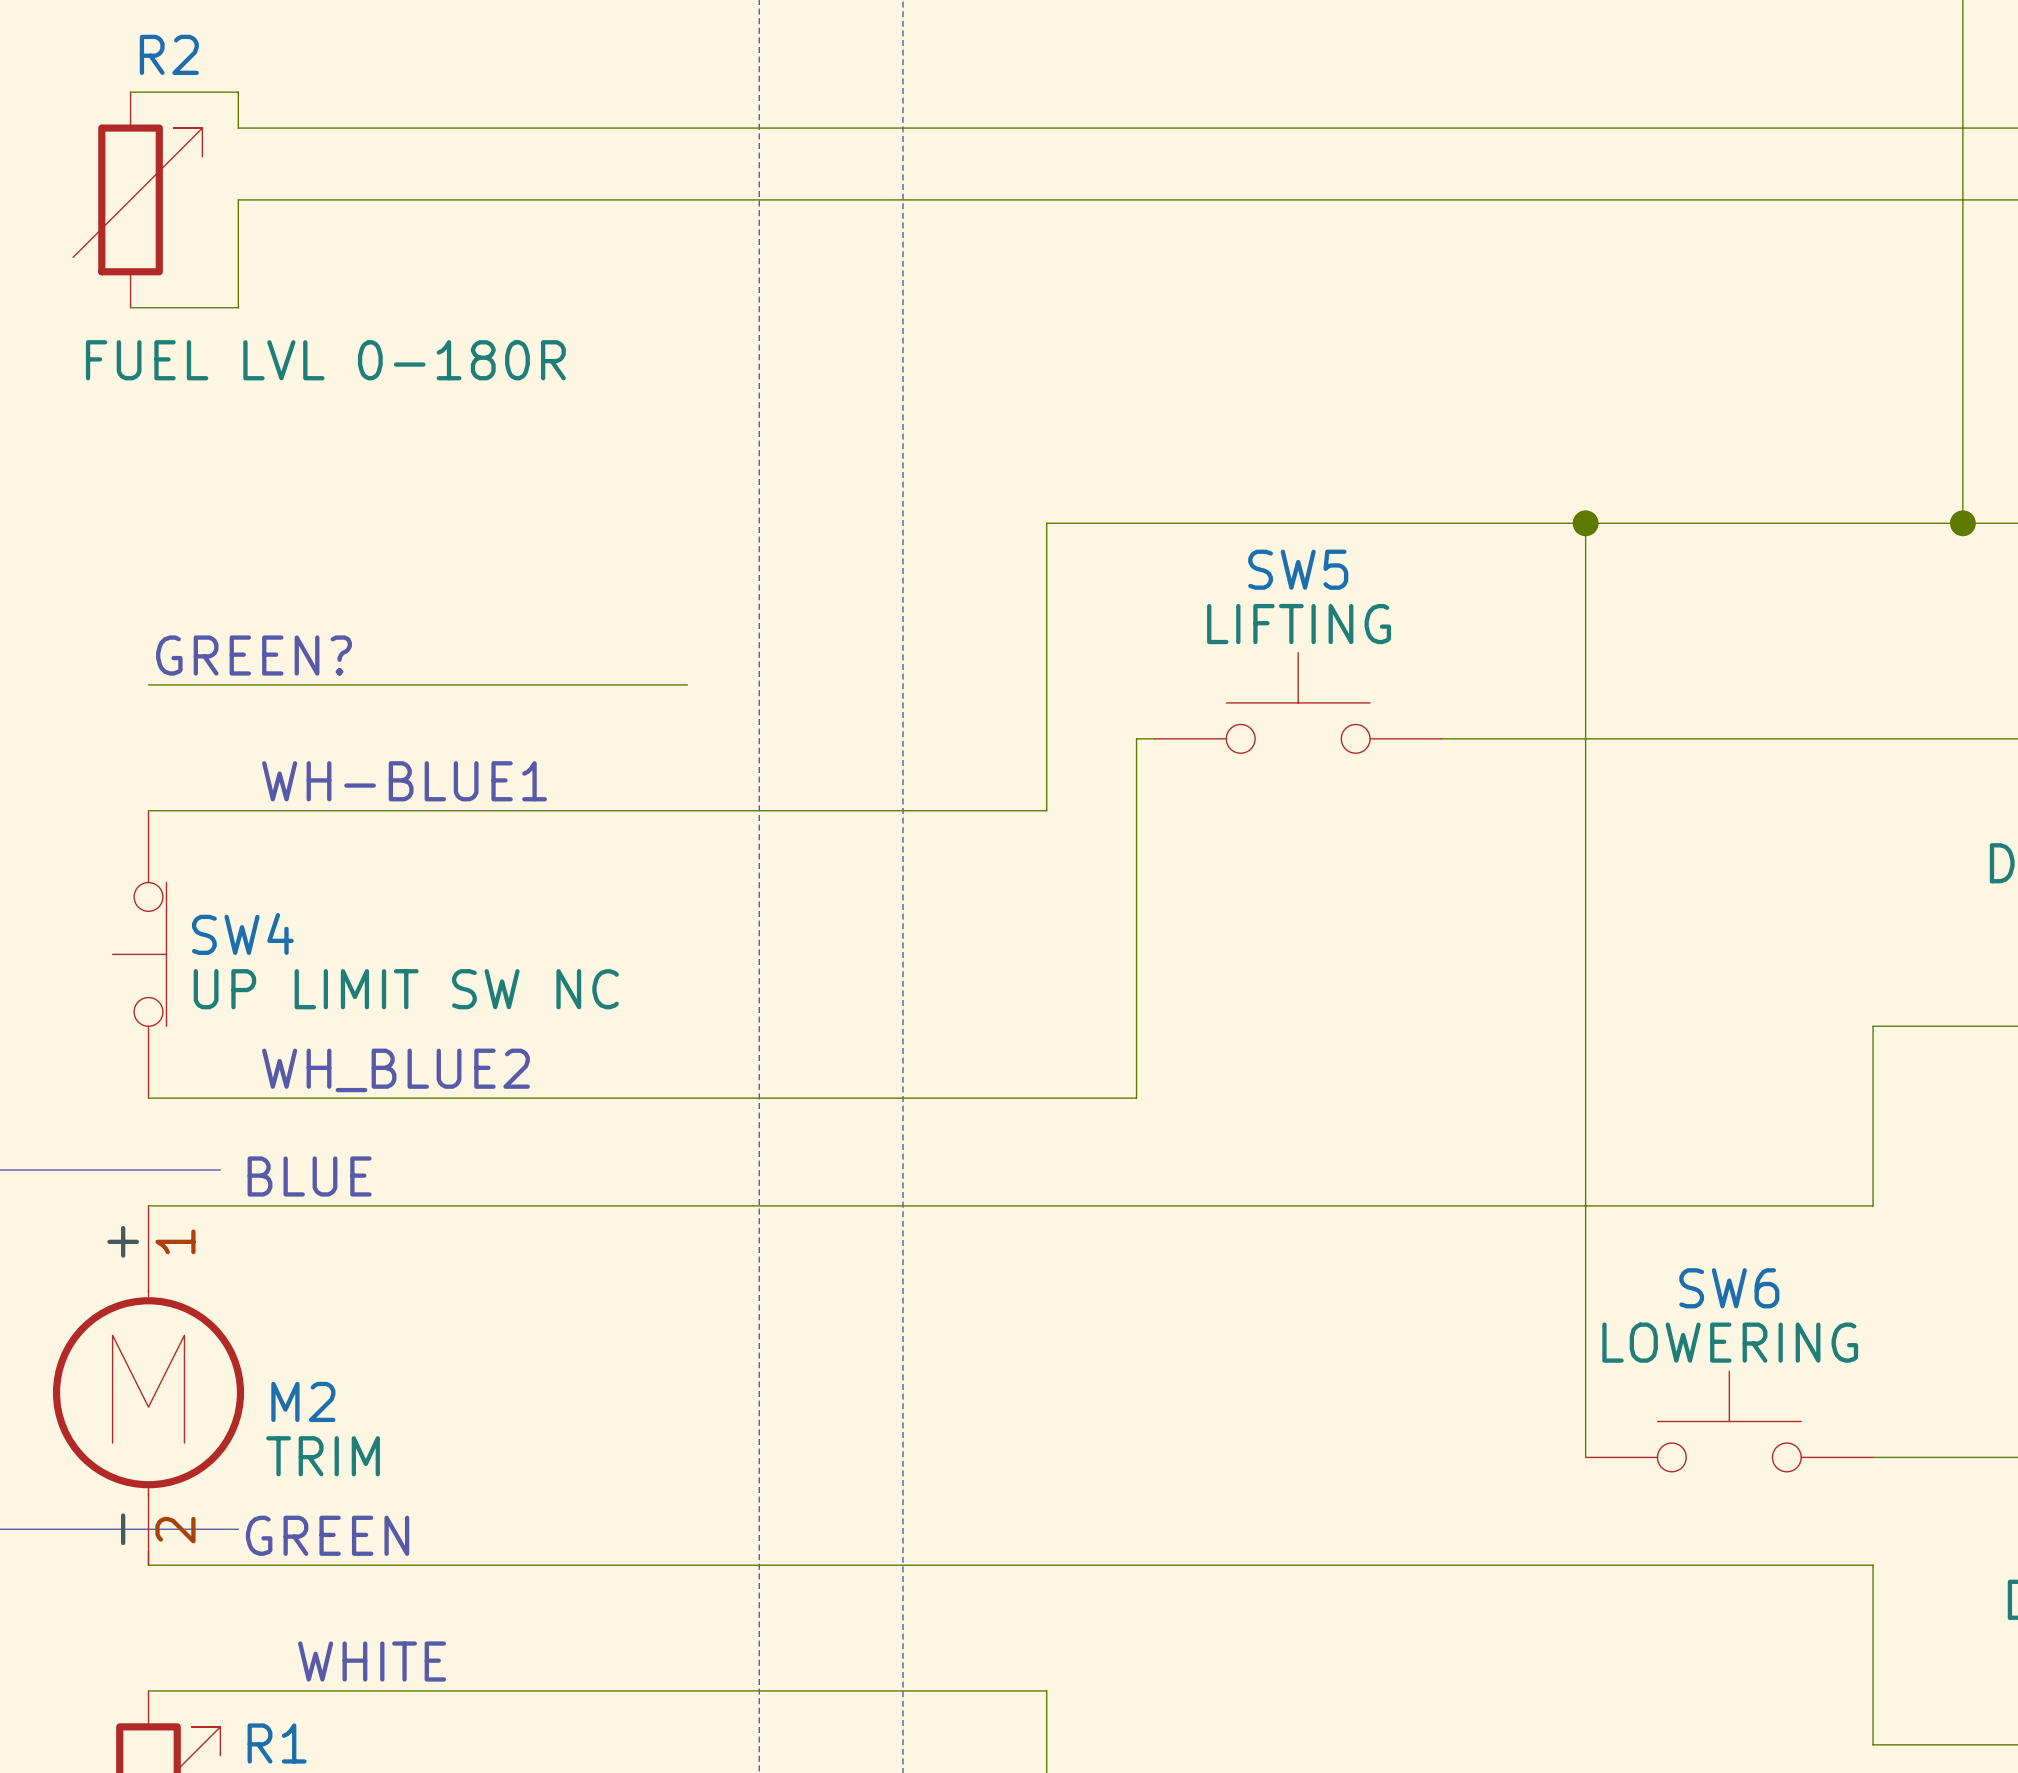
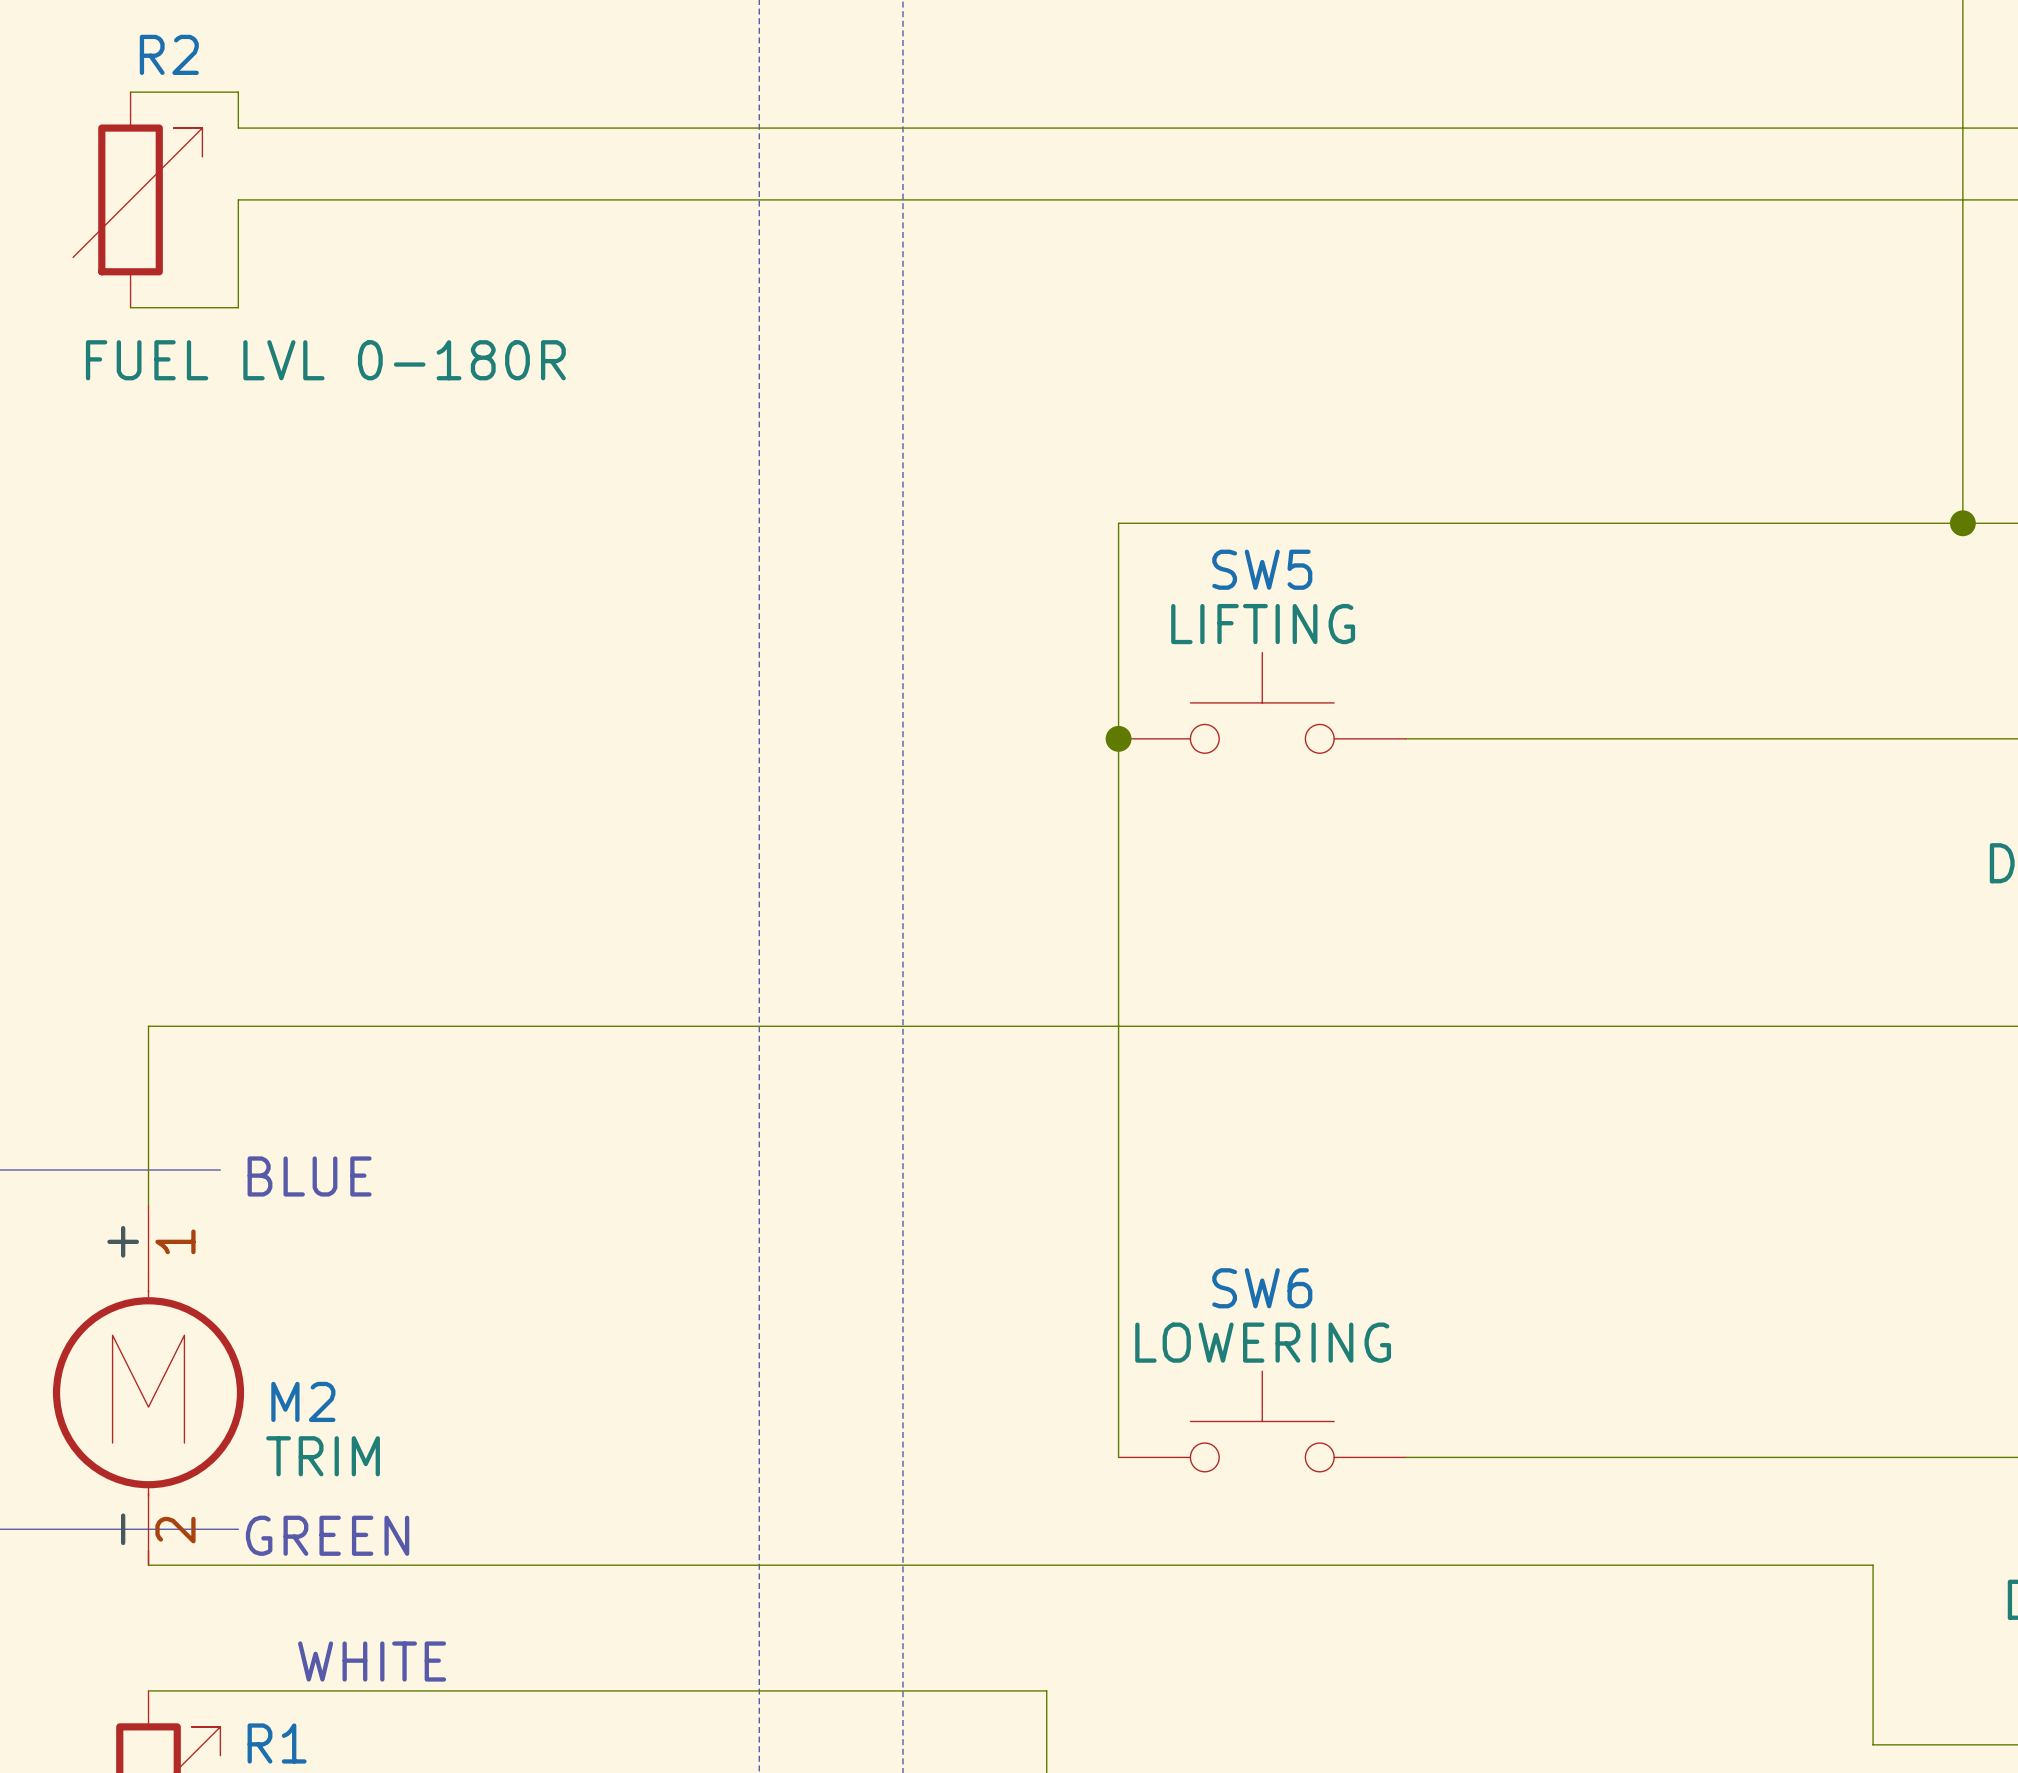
wire: (1118, 523) (1046, 523) (1046, 810) (148, 810) -> (1118, 523) (1118, 1457)
wire: (1585, 523) (1585, 1457) -> none
junction: (1585, 523) -> none
text: GREEN? (253, 655) -> none
wire: (148, 684) (687, 684) -> none
SW5 position: (1298, 702) -> (1262, 702)
junction: none -> (1118, 738)
wire: (1154, 738) (1136, 738) (1136, 1098) (148, 1098) -> none
text: WH-BLUE1 (404, 781) -> none
SW4: UP LIMIT SW NC (139, 954) -> none
wire: (1873, 1026) (1873, 1205) (148, 1205) -> (1873, 1026) (148, 1026) (148, 1205)
text: WH_BLUE2 (396, 1070) -> none
SW6 position: (1729, 1421) -> (1262, 1421)
wire: none -> (1405, 1457) (1873, 1457)

